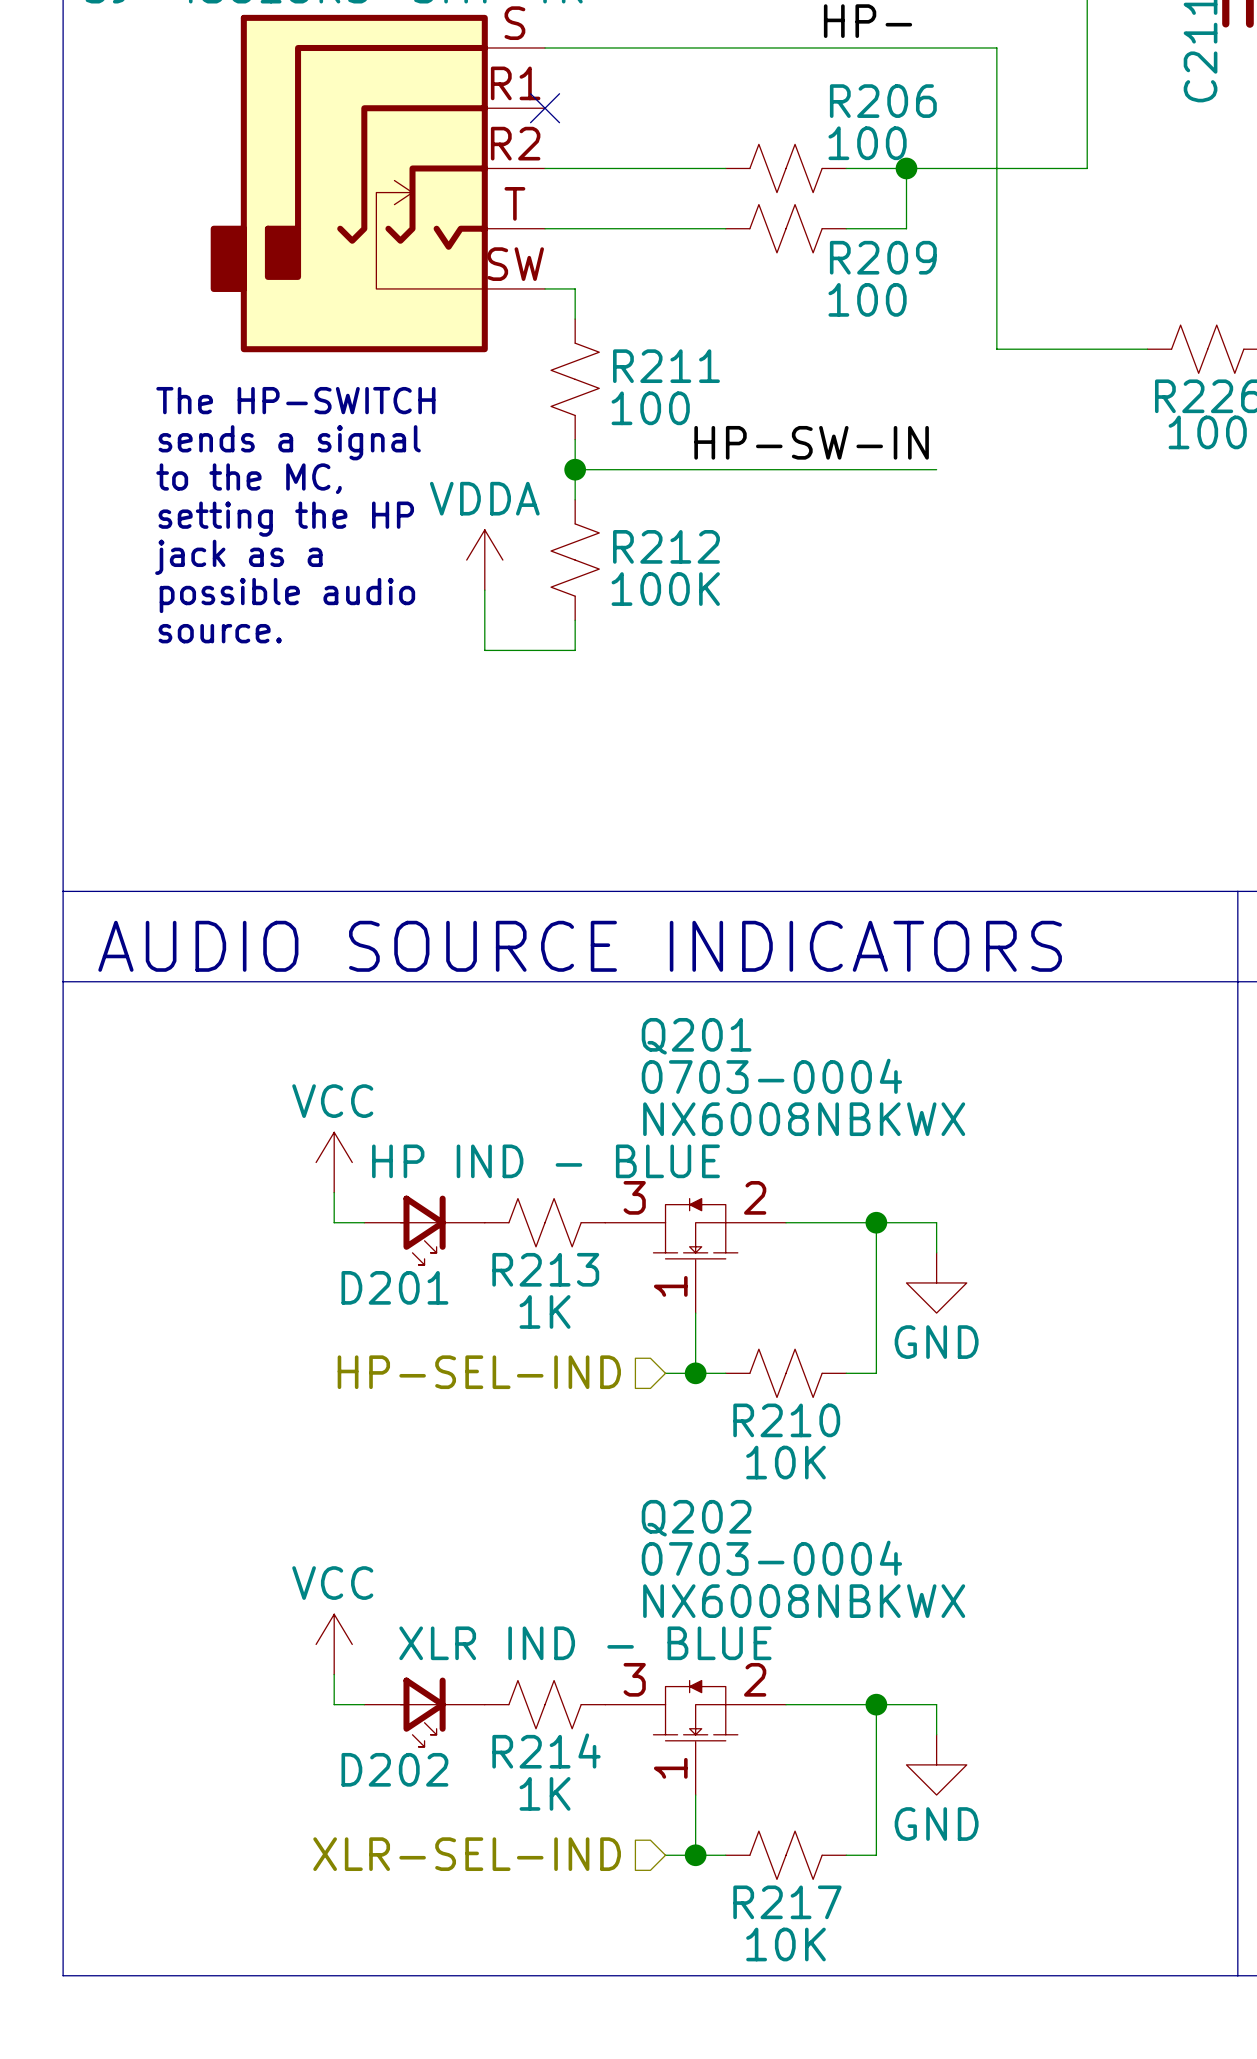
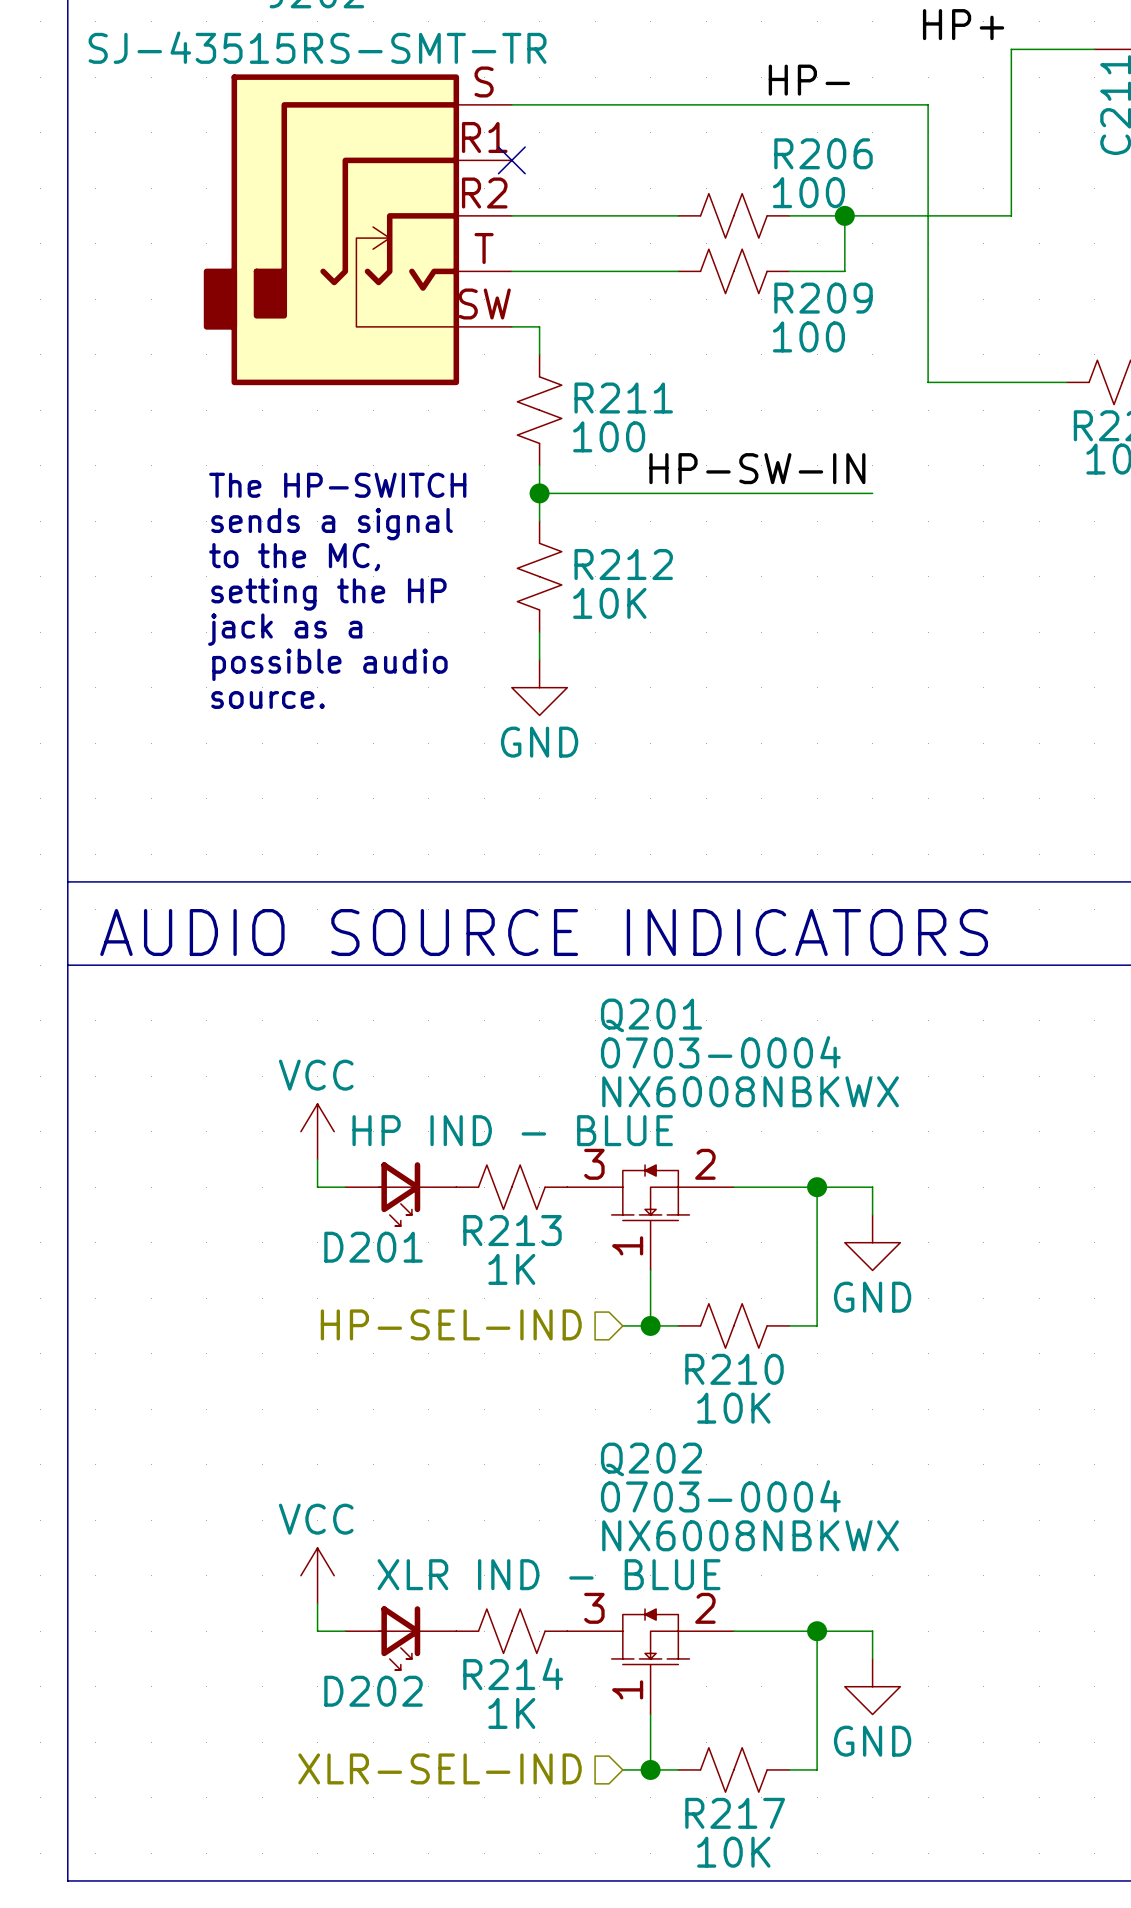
text position: The HP-SWITCH (295, 400) -> The HP-SWITCH (337, 485)
text position: sends a signal (289, 442) -> sends a signal (332, 524)
text position: to the MC, (249, 478) -> to the MC, (294, 557)
text position: setting the HP (286, 519) -> setting the HP (328, 594)
text position: jack as a (238, 557) -> jack as a (285, 629)
power symbol: VDDA (484, 560) -> none
R212 value: 100K (665, 589) -> 10K (609, 603)
wire: (484, 590) (484, 650) (575, 650) -> none
text position: possible audio (287, 595) -> possible audio (329, 664)
text position: source. (220, 633) -> source. (268, 699)
power symbol: none -> GND (539, 687)

